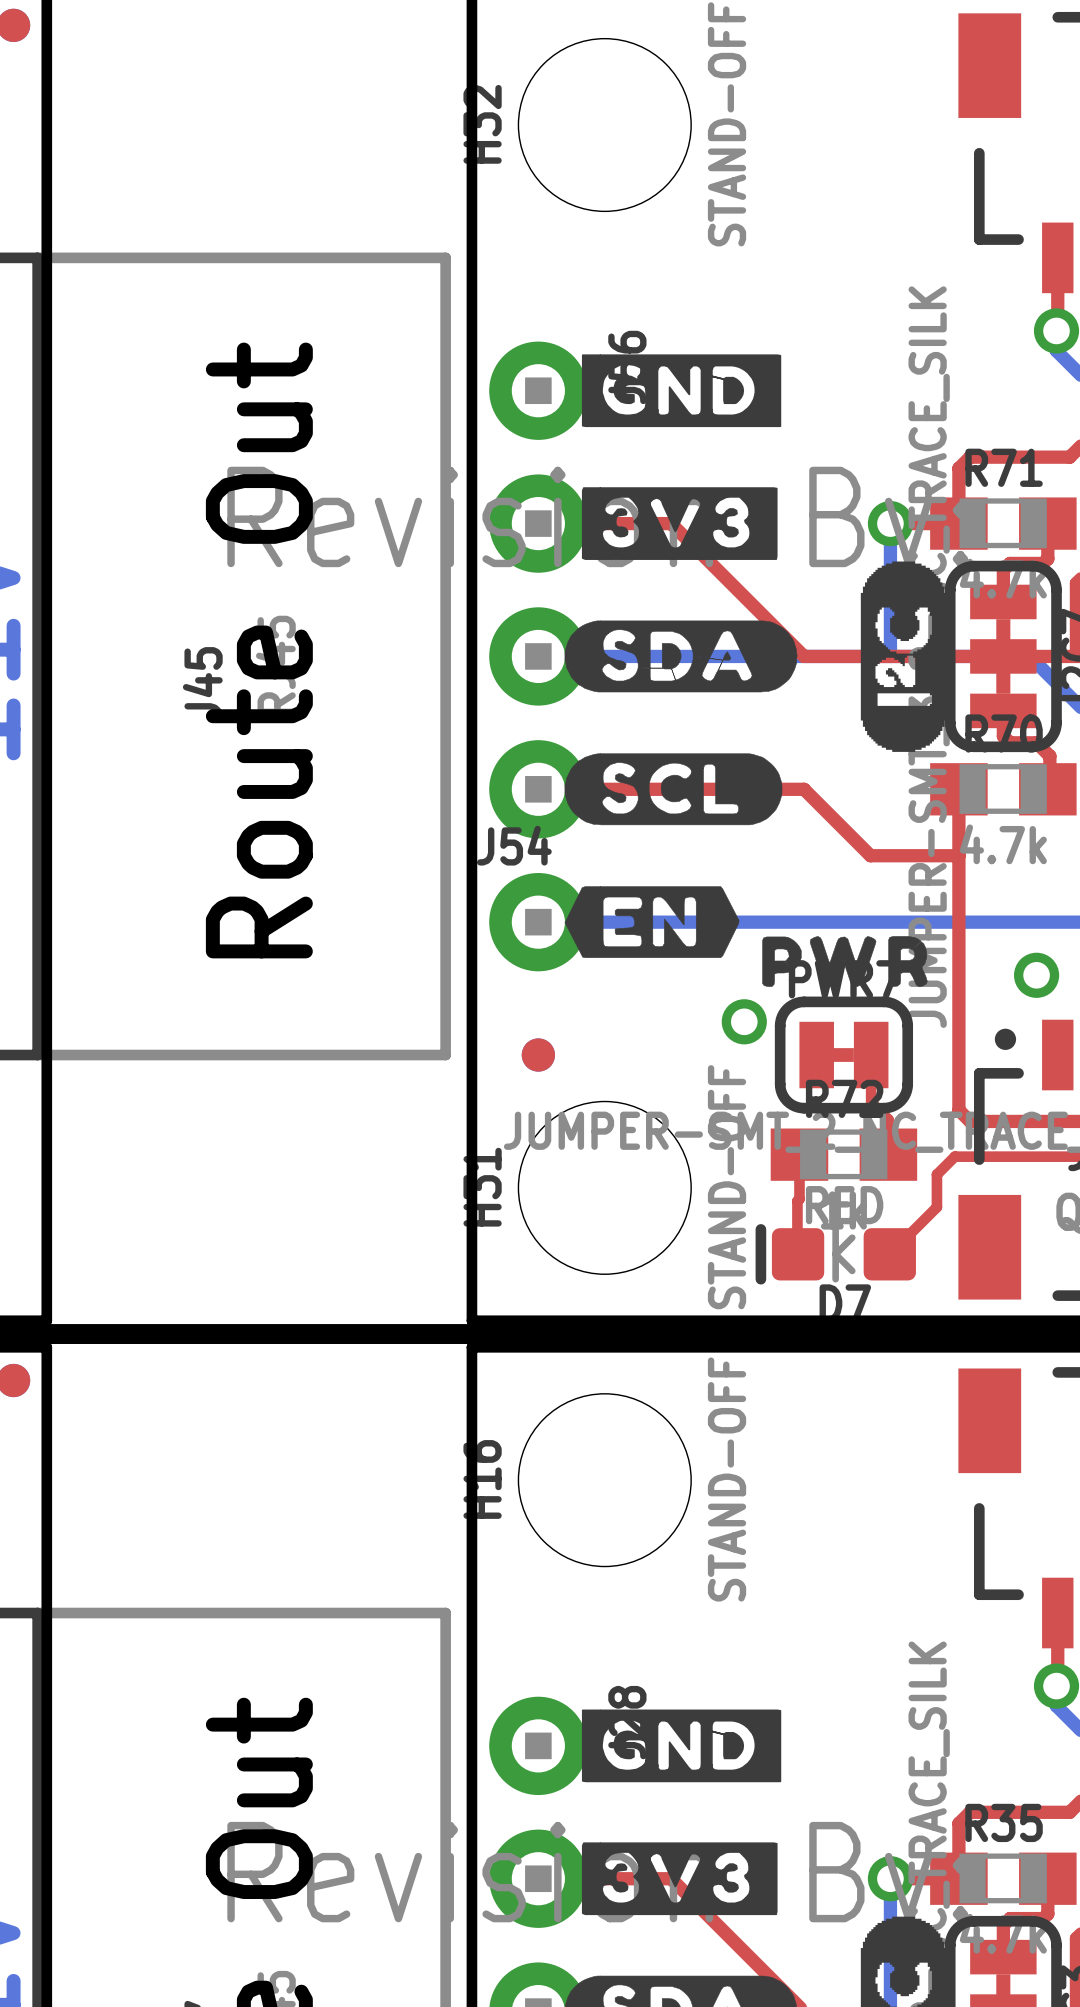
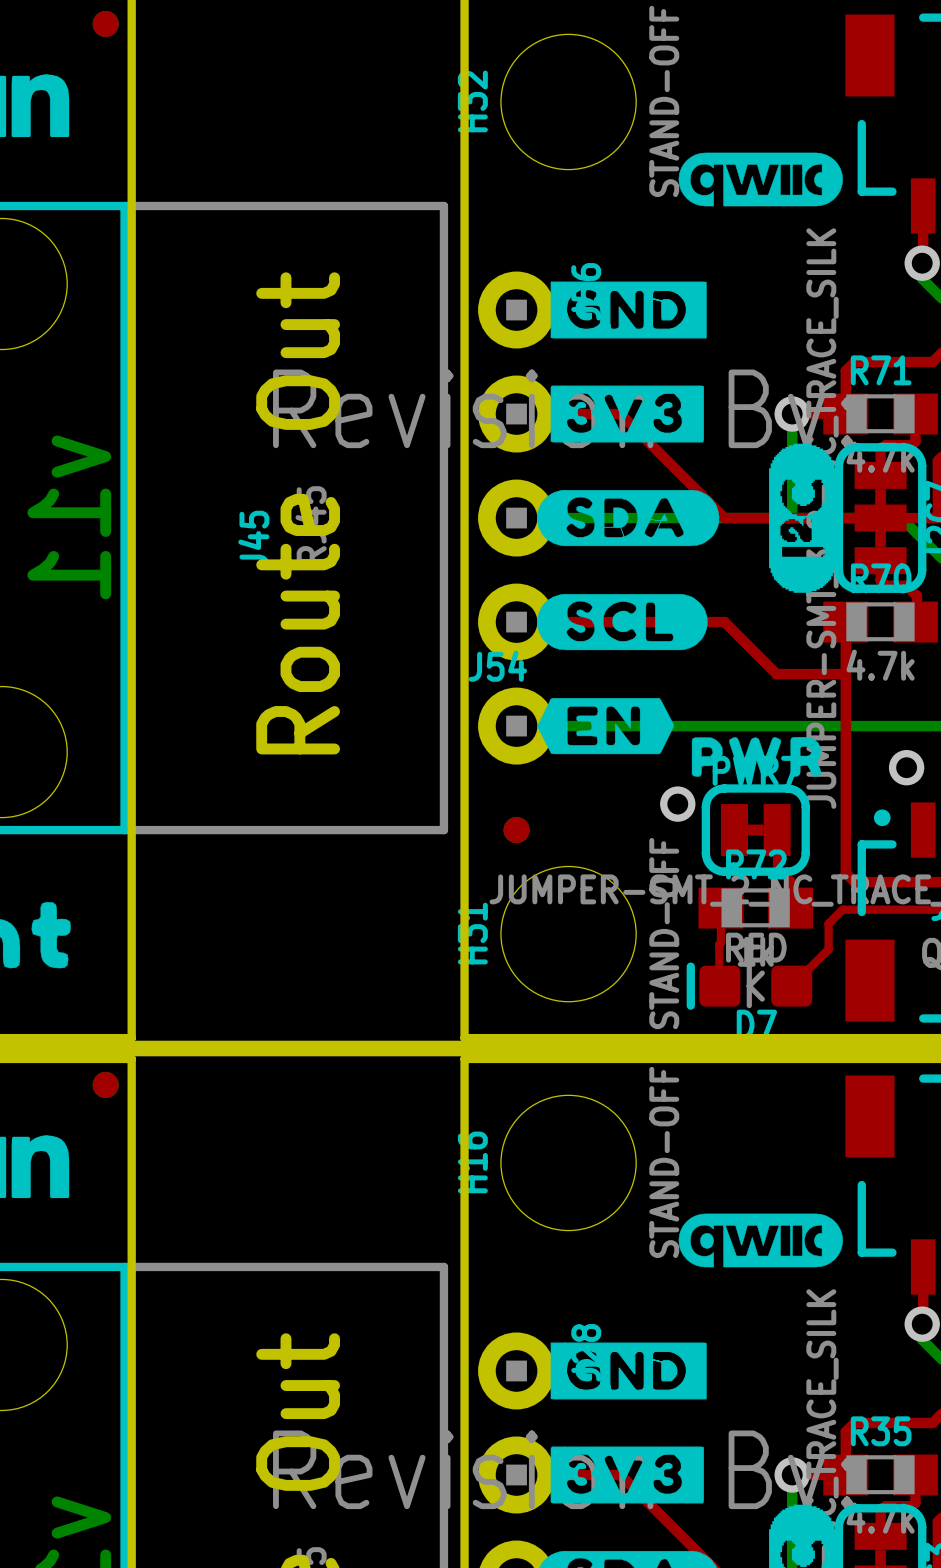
drawing: none -> [678, 152, 843, 207]
drawing: none -> [678, 1213, 843, 1268]

